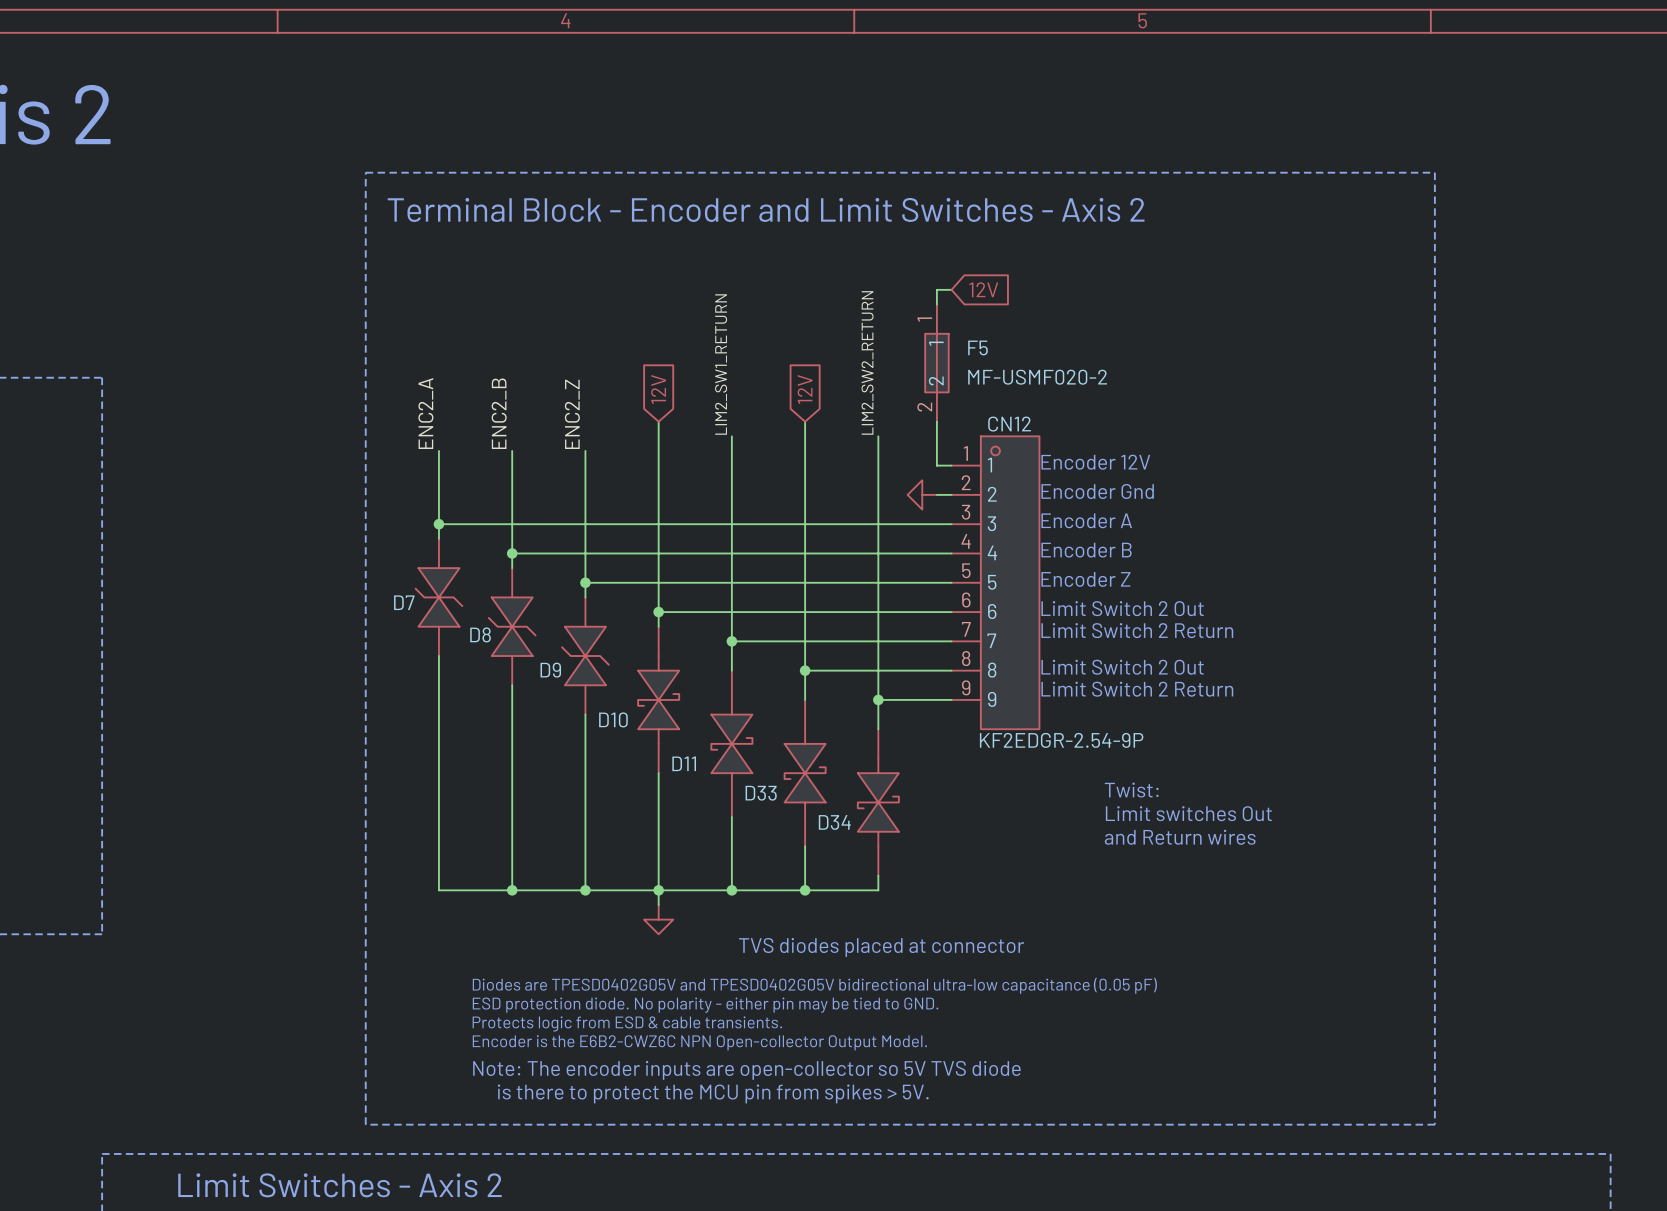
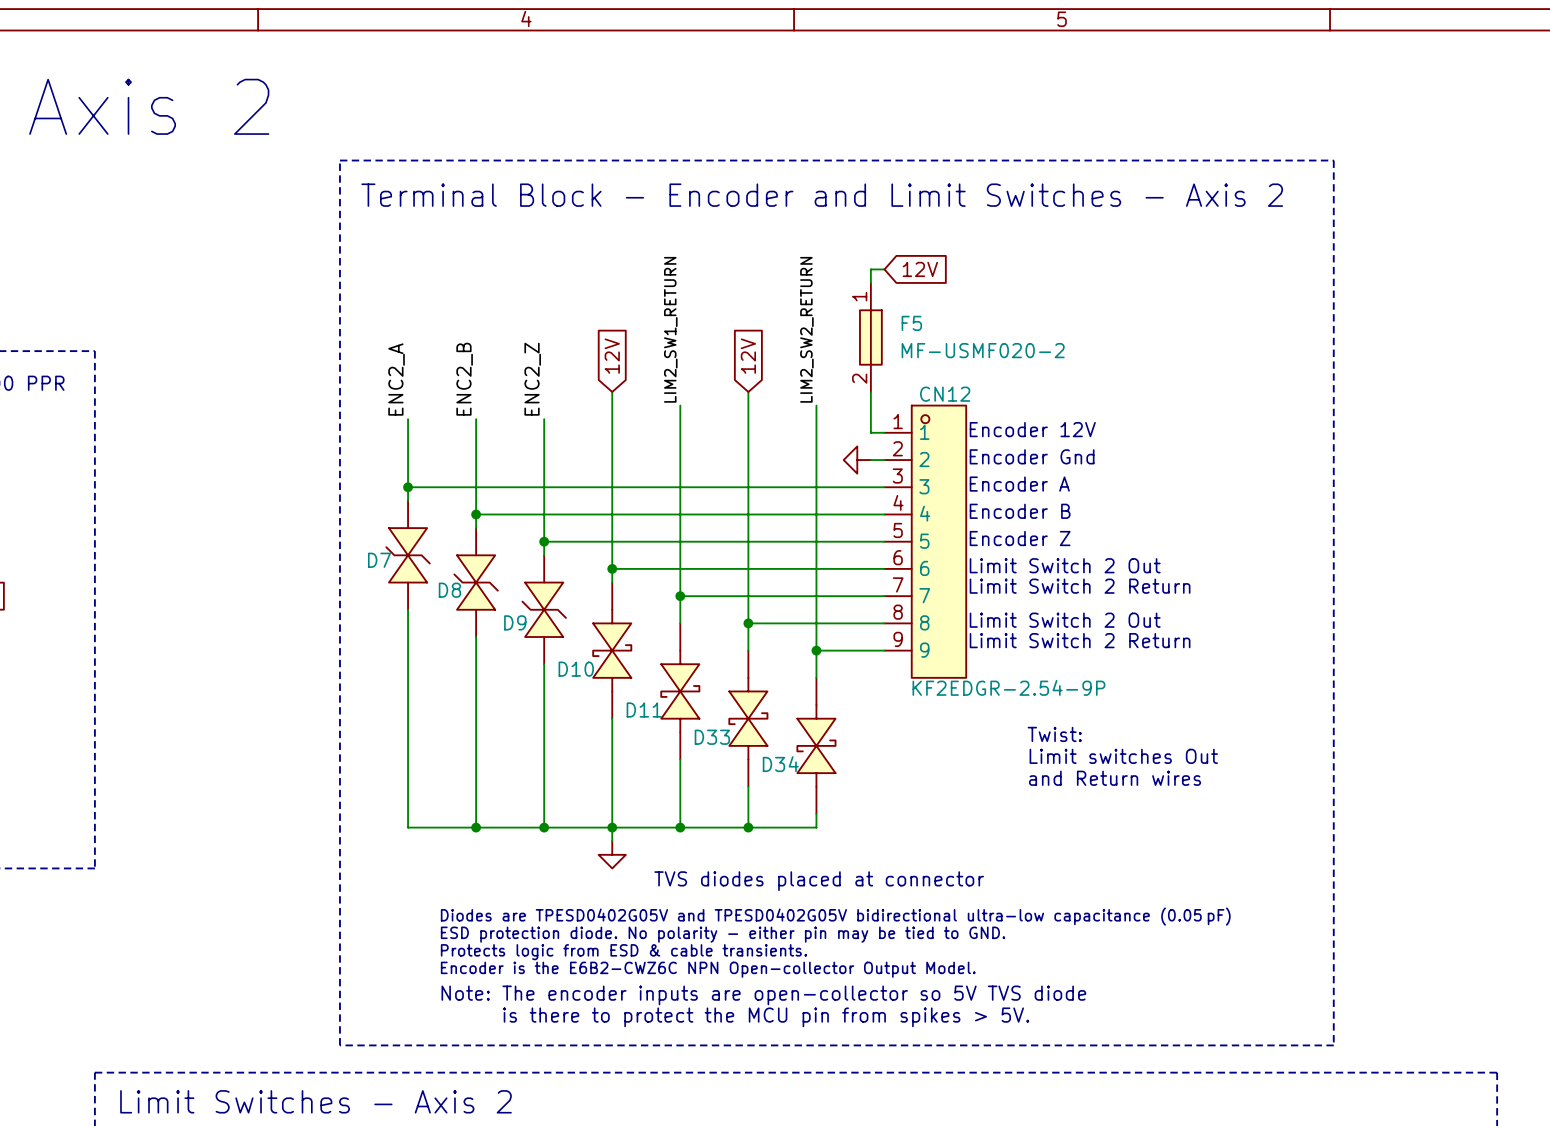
F5 pin name: 1 (936, 343) -> none
F5 pin name: 2 (936, 380) -> none

